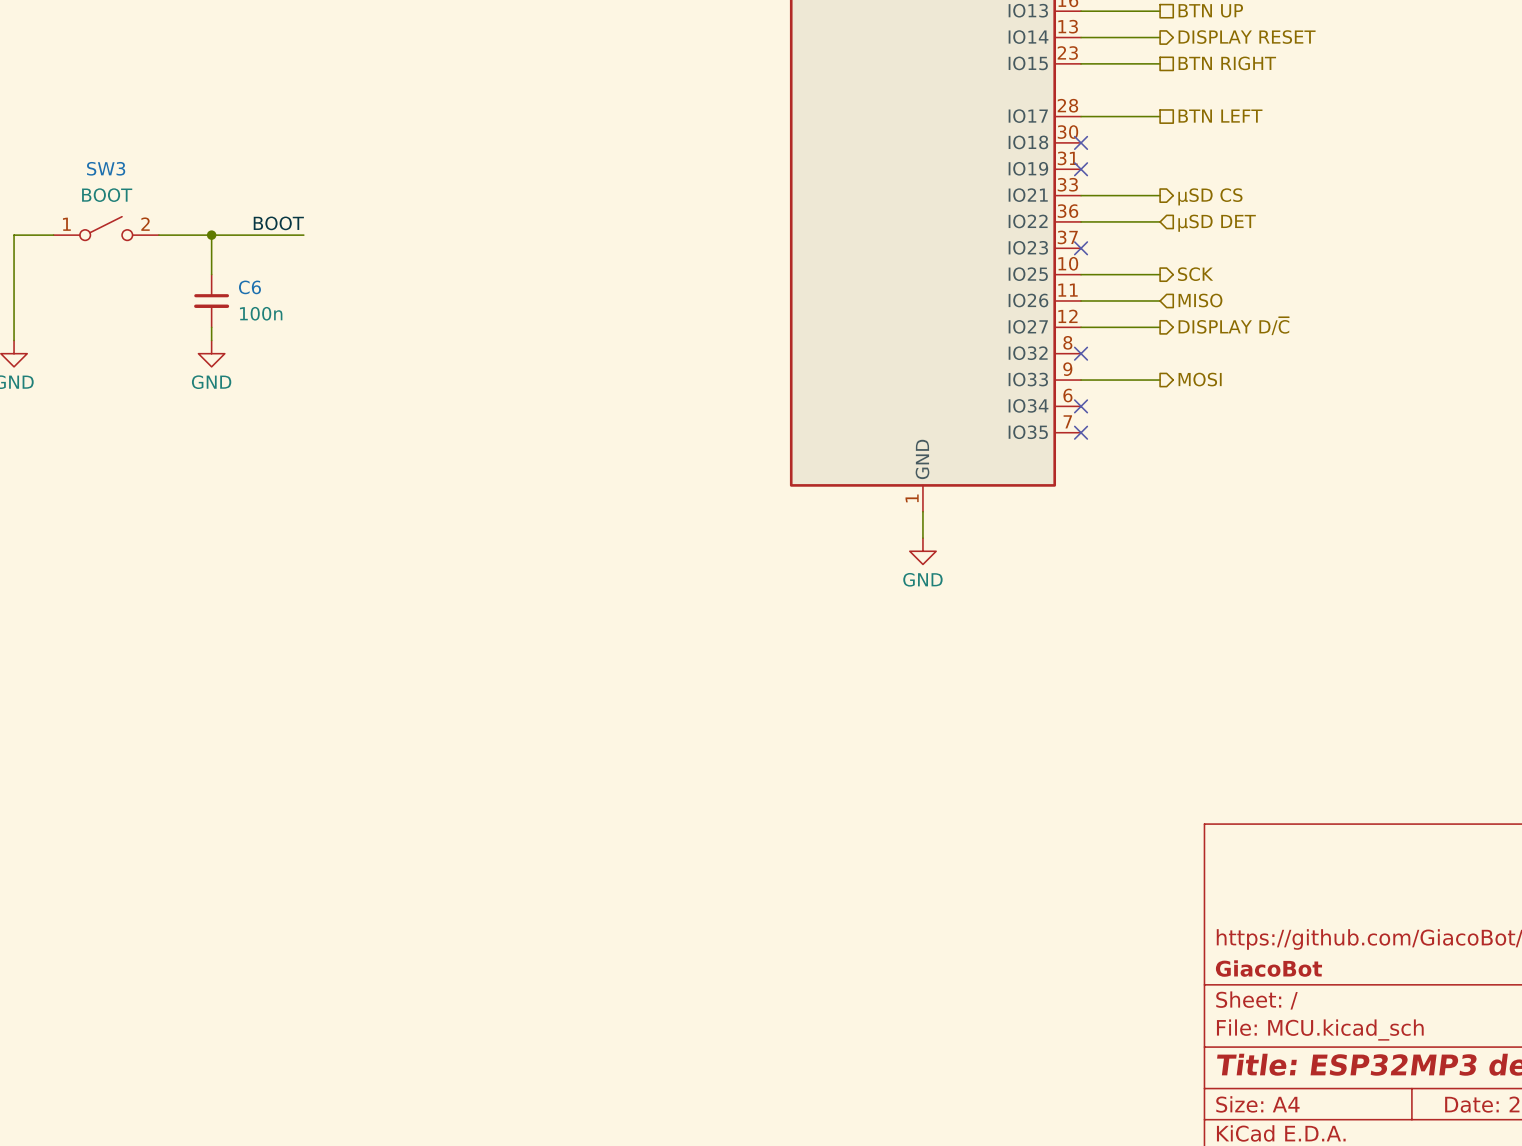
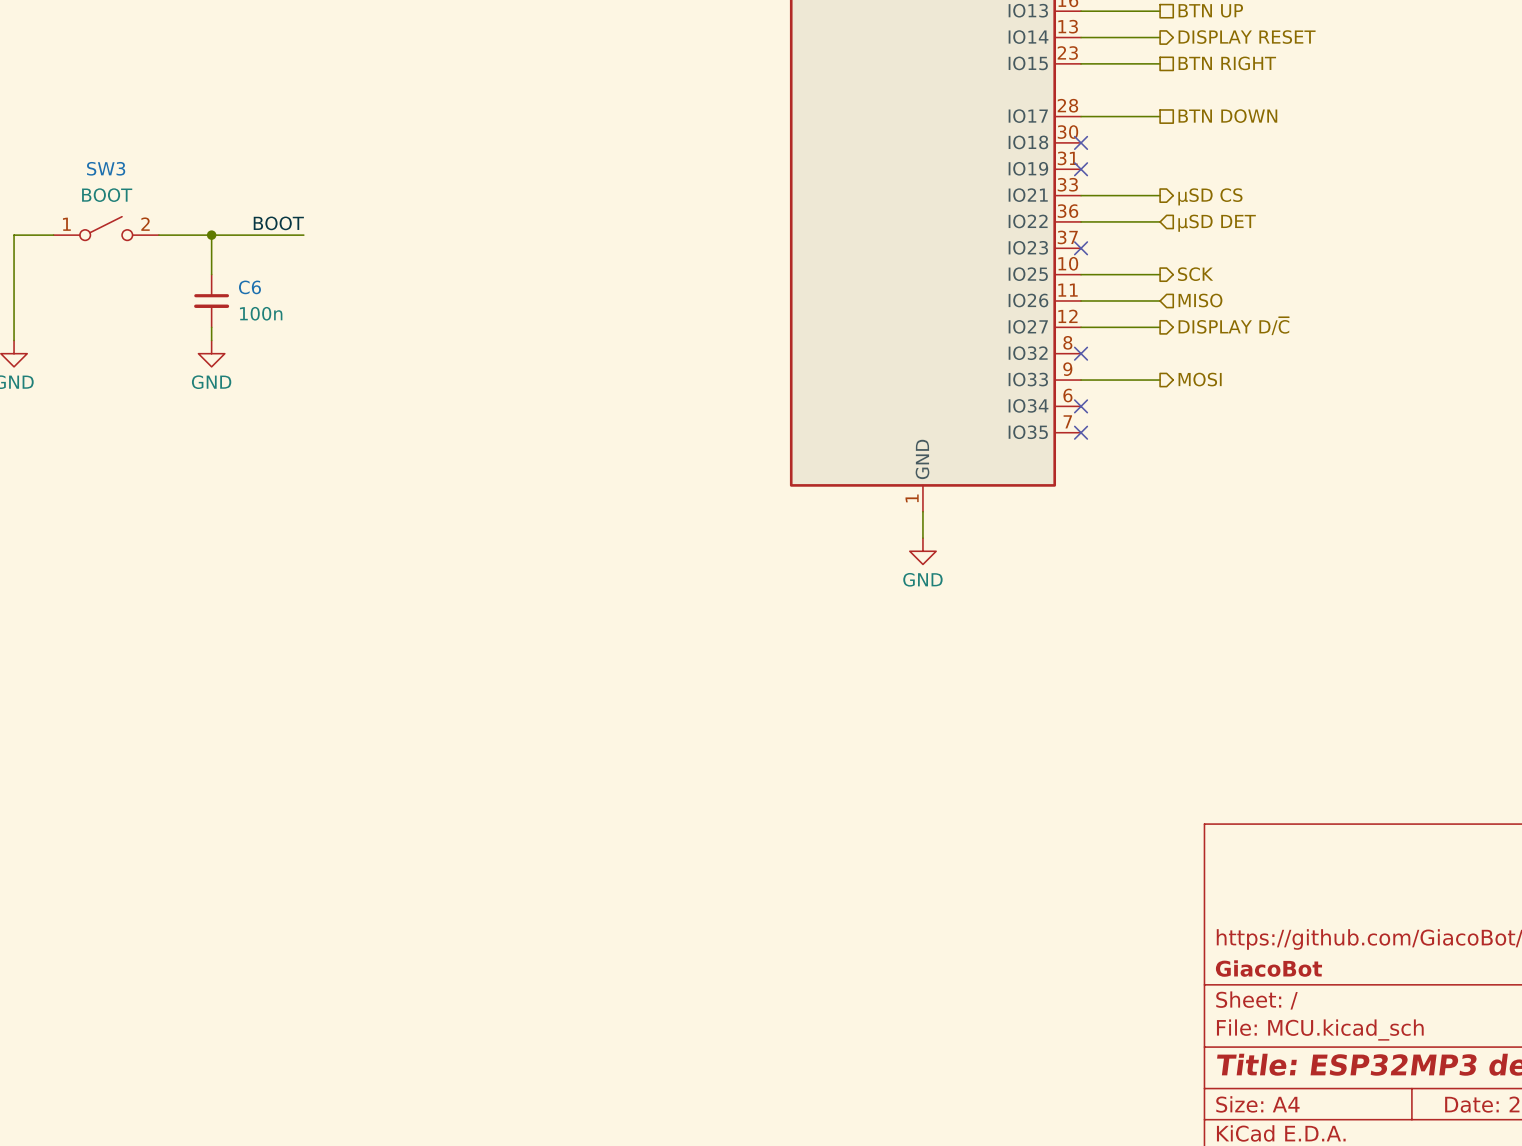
hierarchical label: BTN LEFT (1220, 116) -> BTN DOWN (1227, 116)

